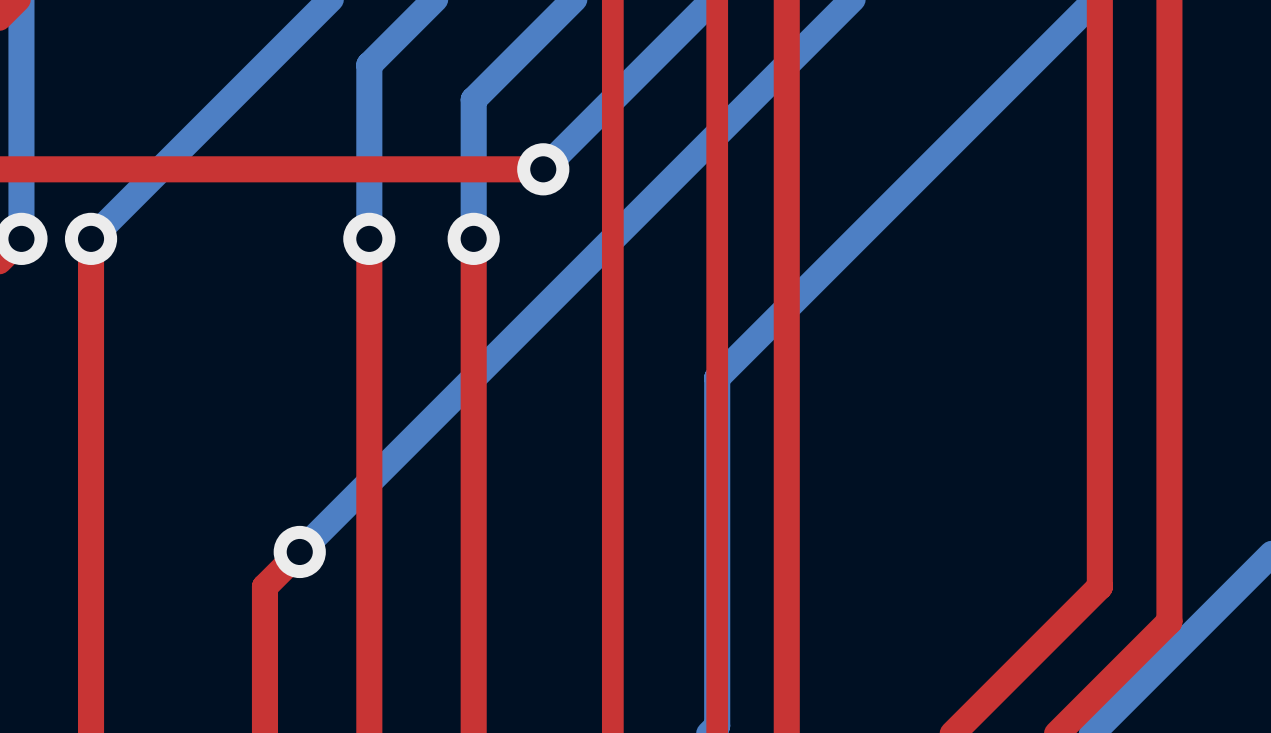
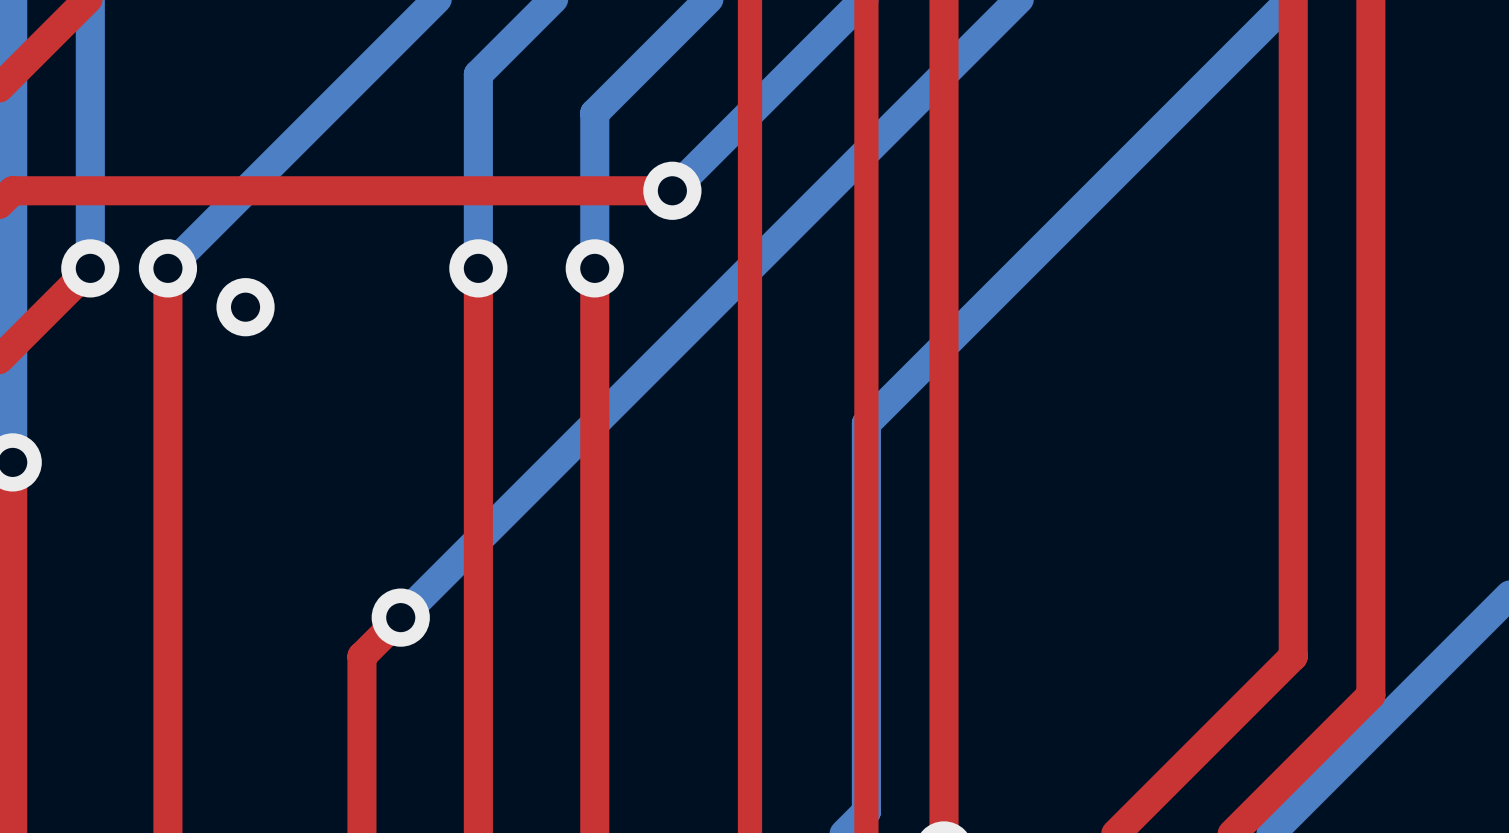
via: none -> (245, 307)

